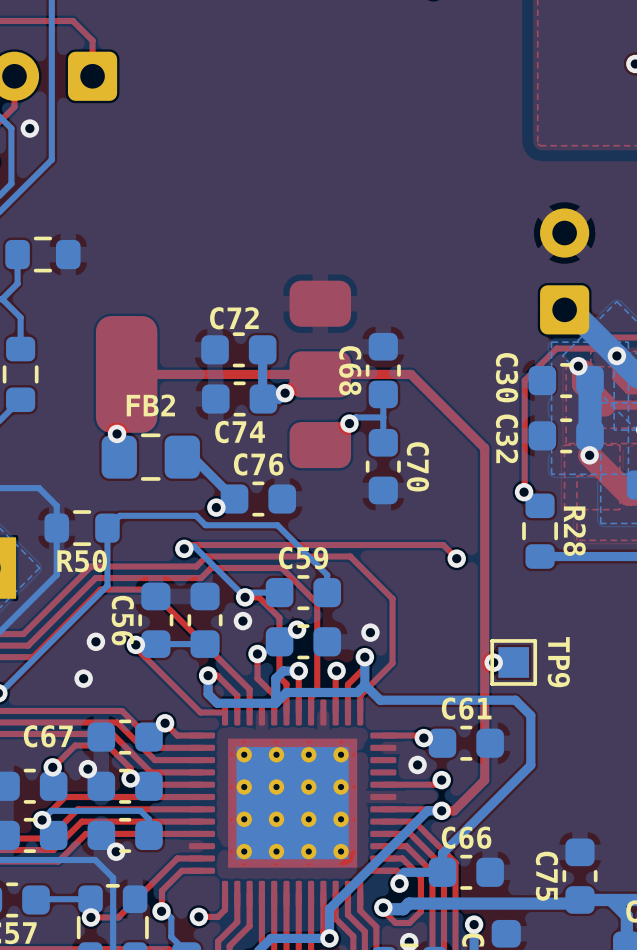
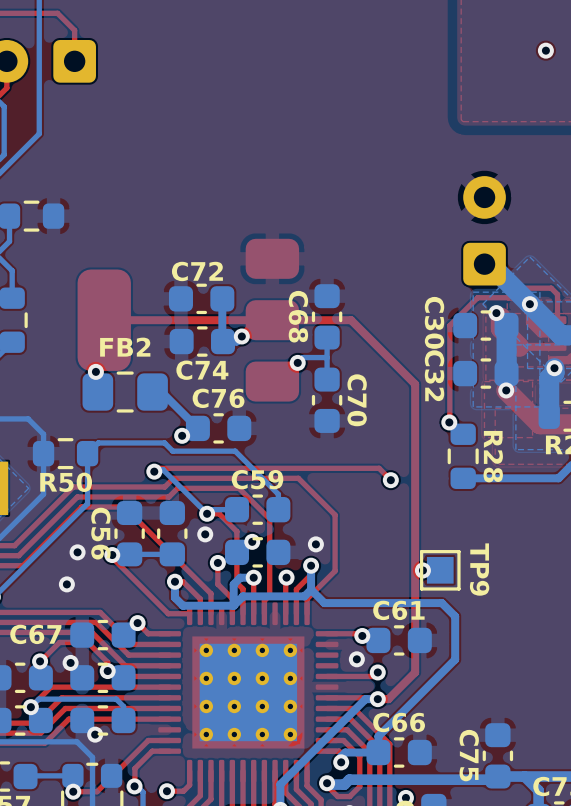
via: (29, 128) -> none

